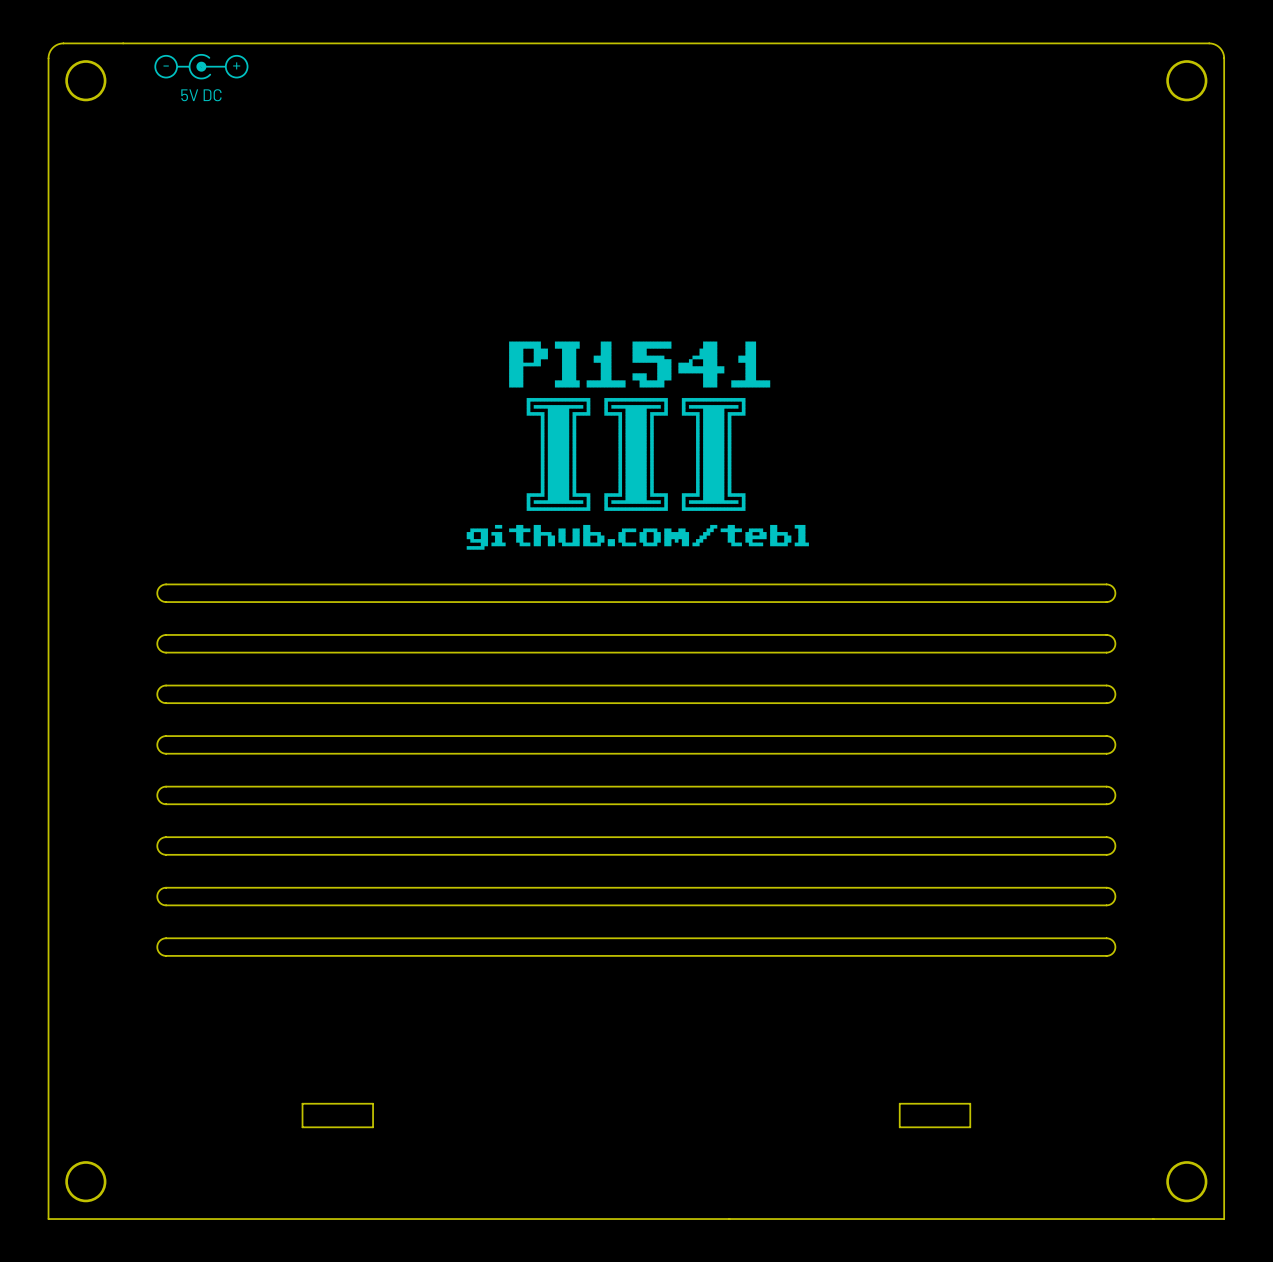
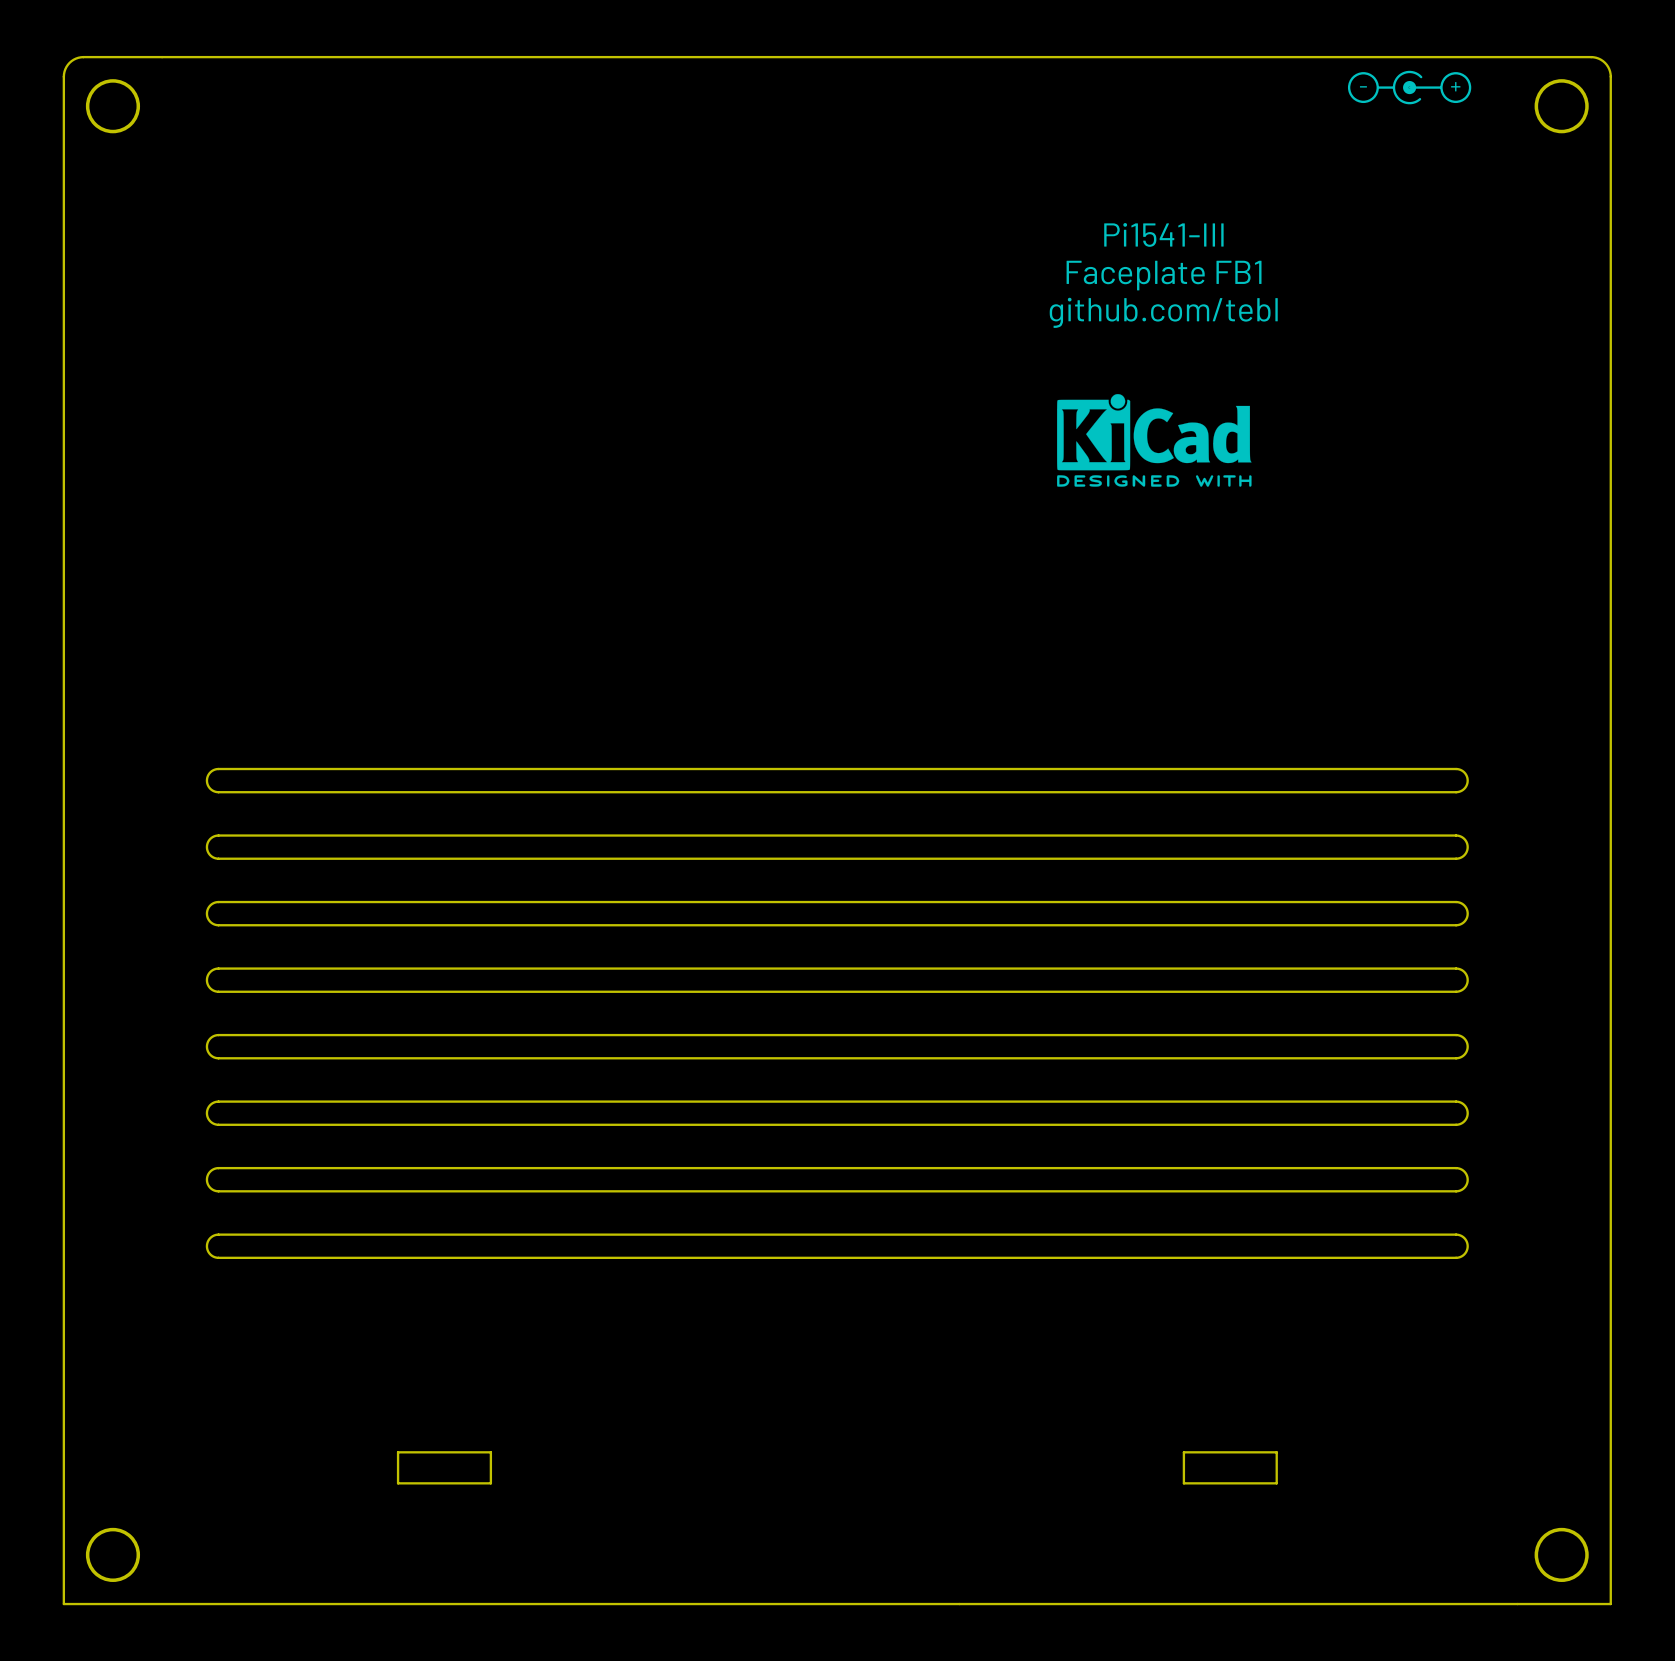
drawing: [154, 53, 249, 80] -> none
drawing: none -> [1347, 70, 1472, 105]
text: 5V DC (201, 95) -> none
text: none -> Pi1541-III (1163, 234)
text: none -> Faceplate FB1 (1164, 275)
text: none -> github.com/tebl (1163, 312)
drawing: none -> [1057, 394, 1252, 487]
drawing: [466, 341, 809, 550] -> none

